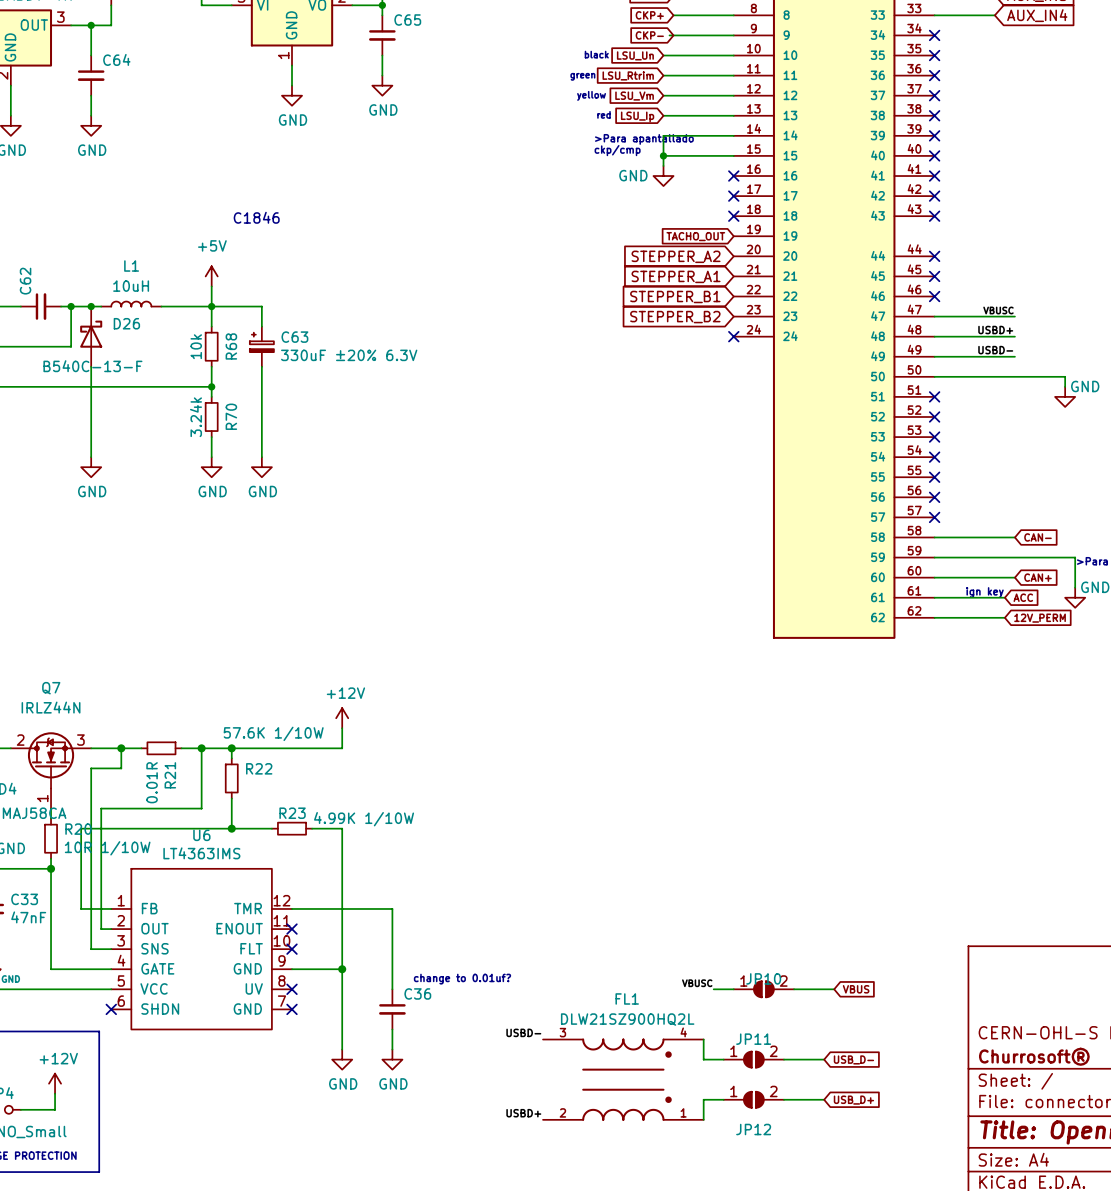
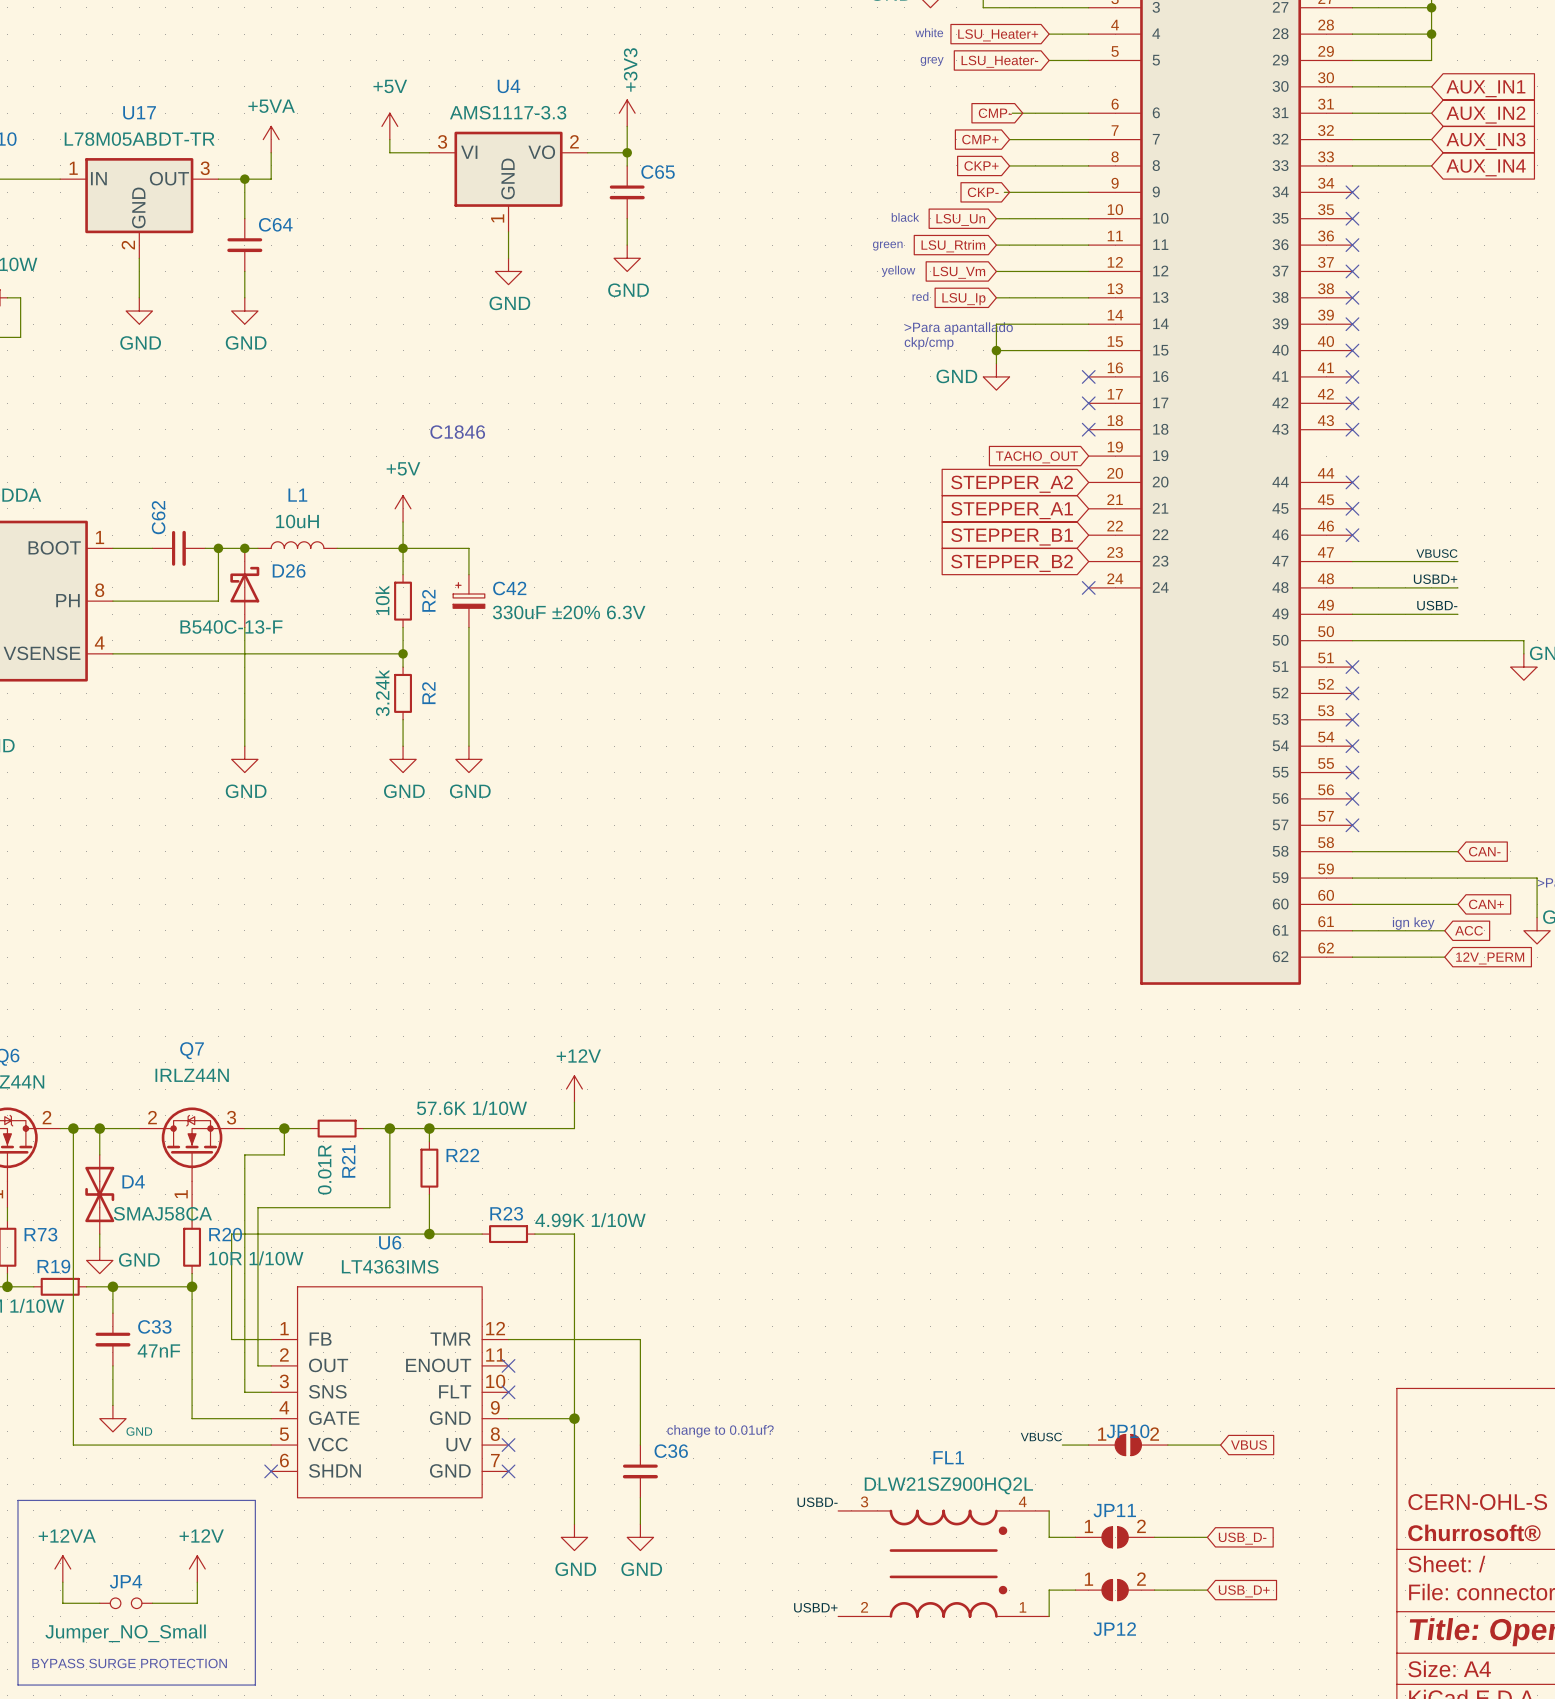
C63 name: C63 (294, 337) -> C42 (509, 588)
R68 name: R68 (231, 346) -> R2 (428, 600)
R70 name: R70 (231, 416) -> R2 (428, 693)

